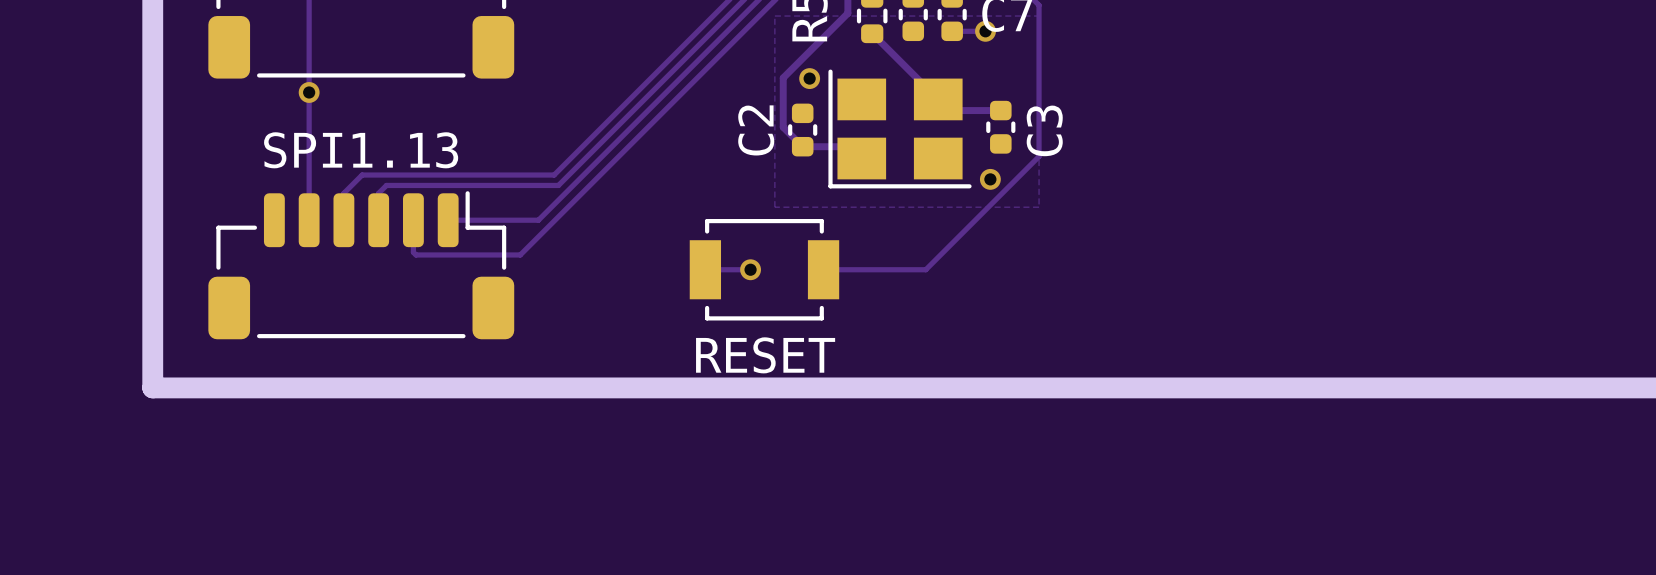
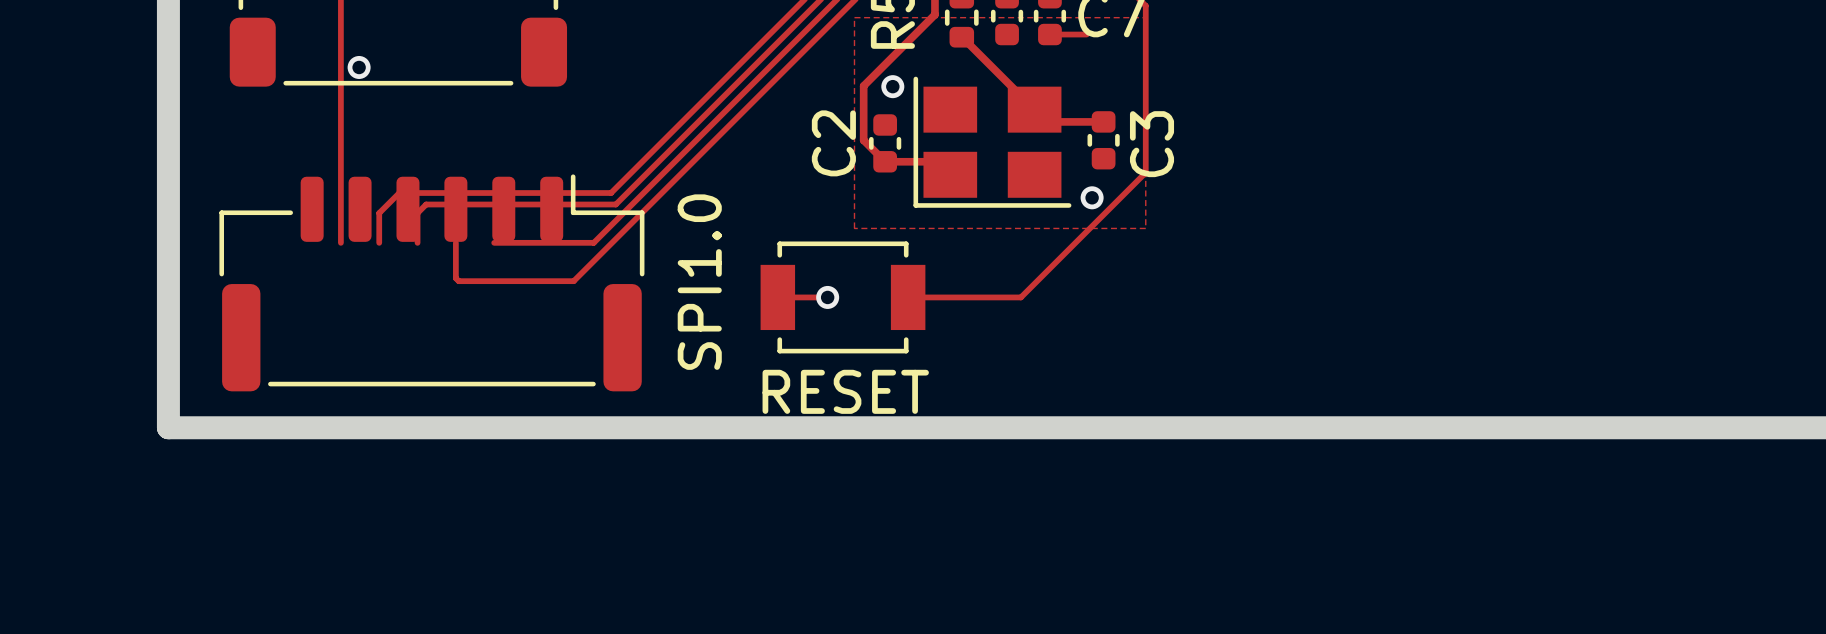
via: (985, 31) -> none
via position: (309, 92) -> (359, 67)
part value: SPI1.13 (361, 150) -> SPI1.0 (699, 282)
part footprint: [208, 191, 515, 340] -> [219, 174, 645, 392]

